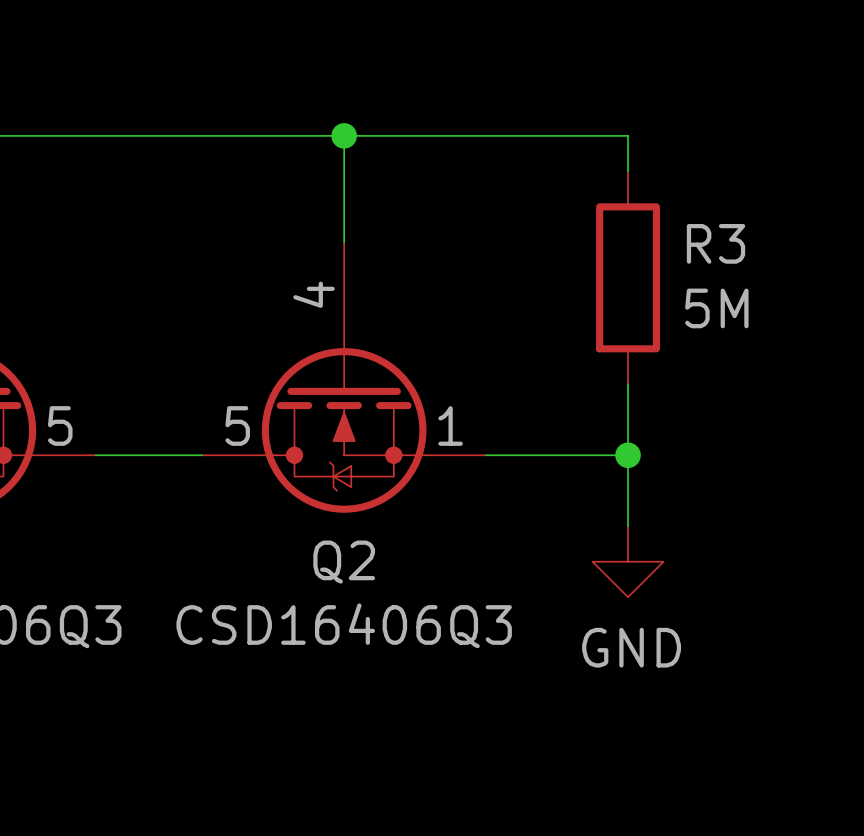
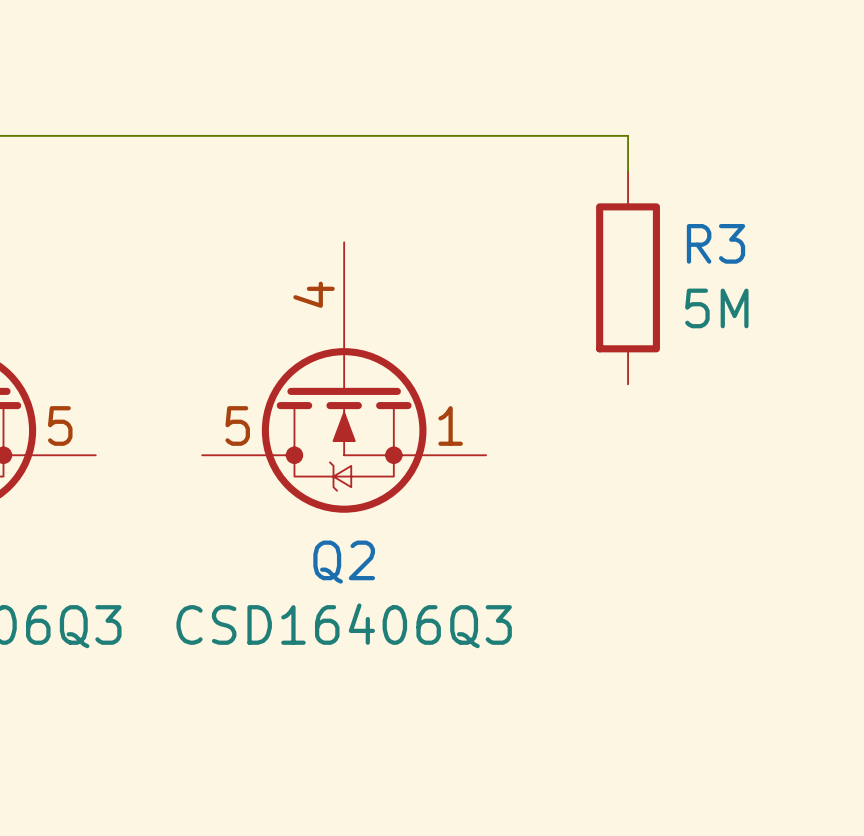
wire: (344, 135) (344, 242) -> none
junction: (344, 135) -> none
wire: (628, 384) (628, 526) -> none
wire: (95, 455) (202, 455) -> none
wire: (486, 455) (628, 455) -> none
junction: (628, 455) -> none
power symbol: GND (628, 561) -> none

